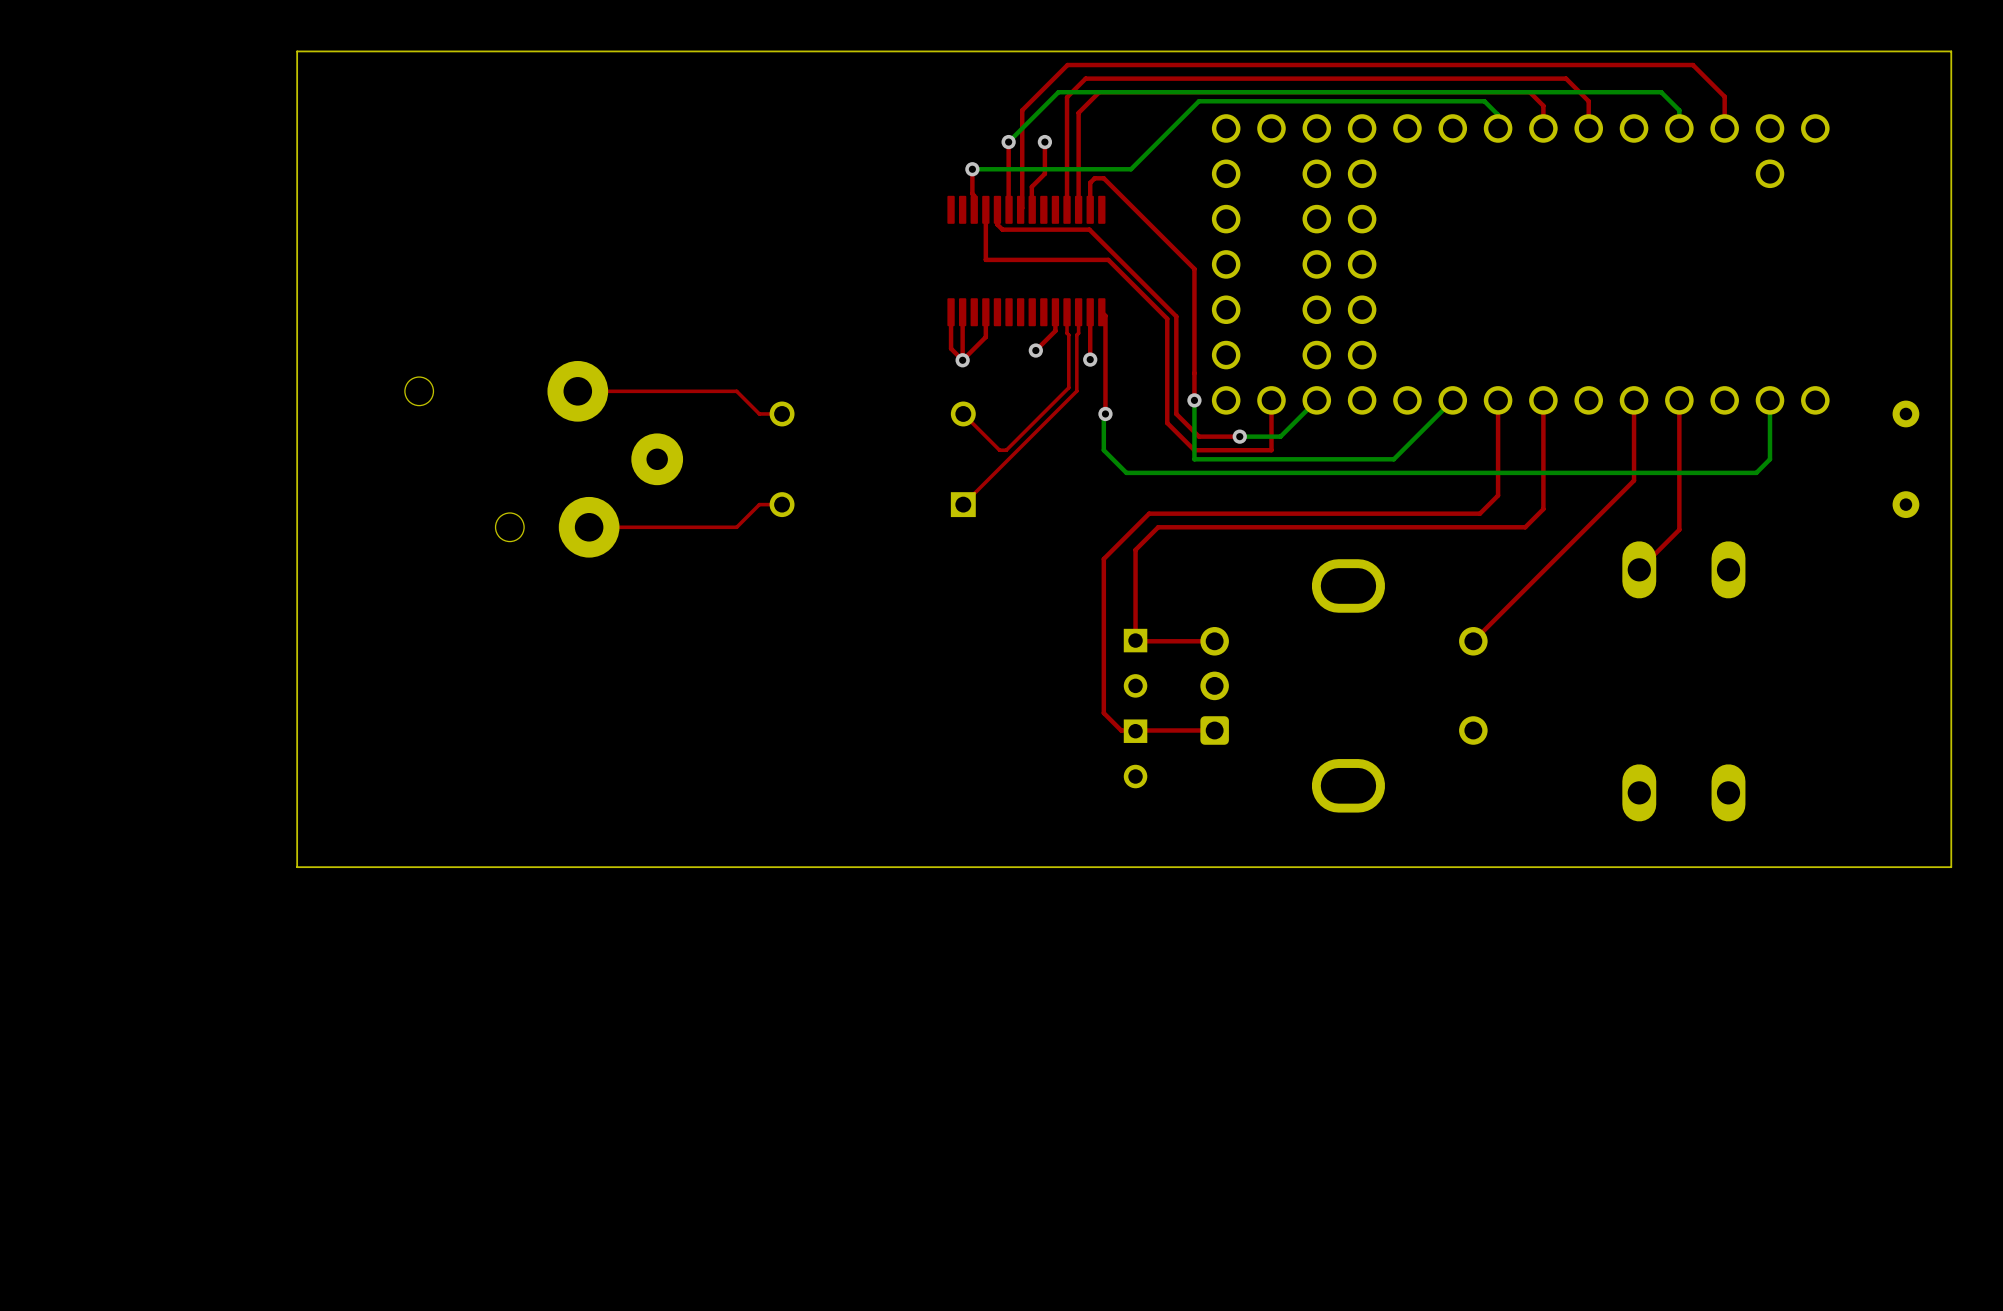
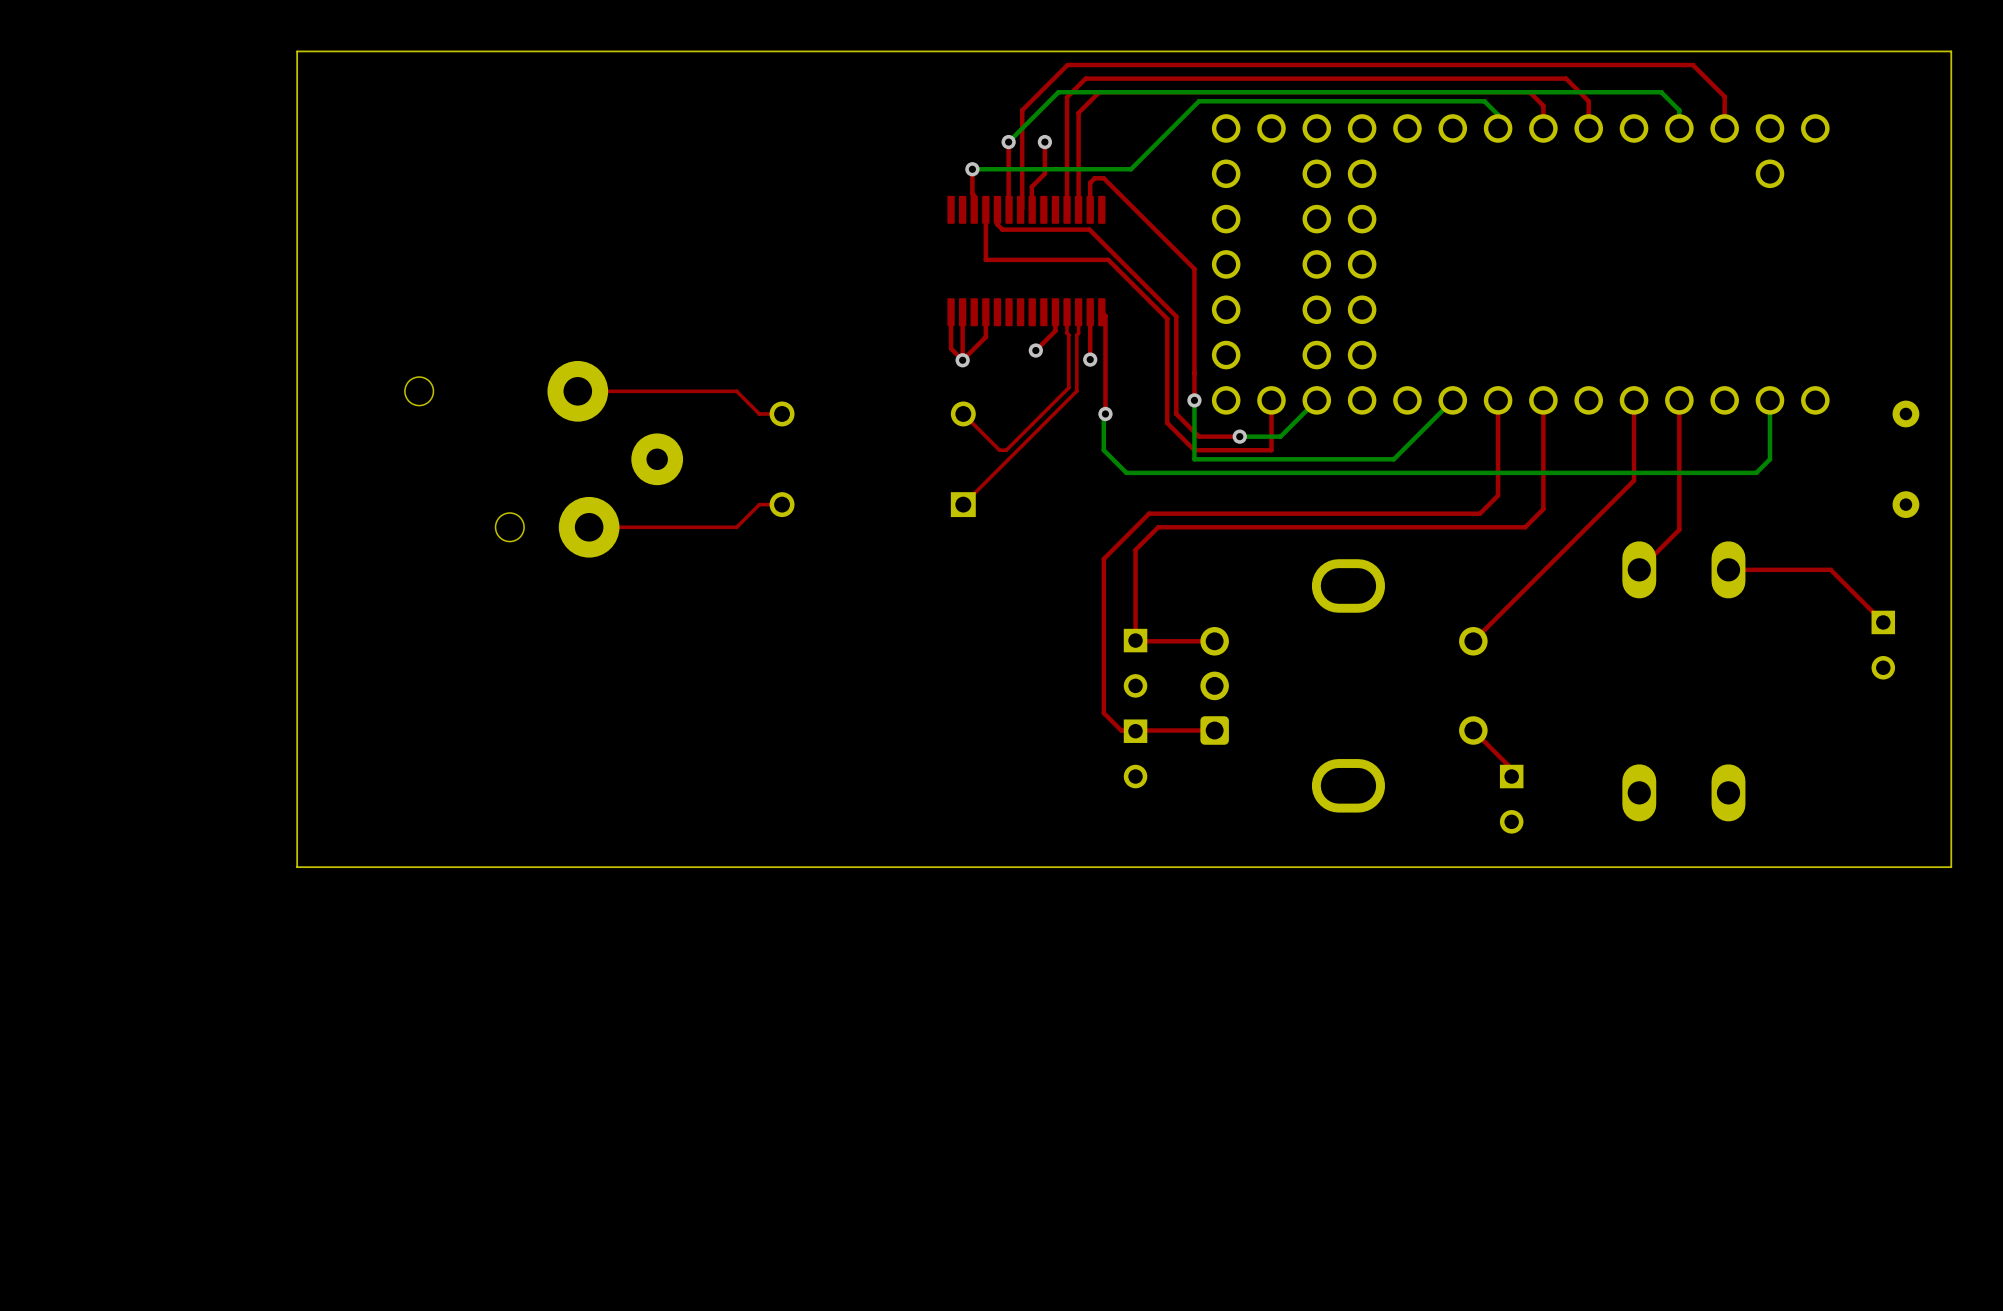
top track: none -> (1728, 569) (1830, 569) (1883, 622)
part: none -> (1883, 645)
top track: none -> (1473, 730) (1511, 768) (1511, 776)
part: none -> (1511, 799)

